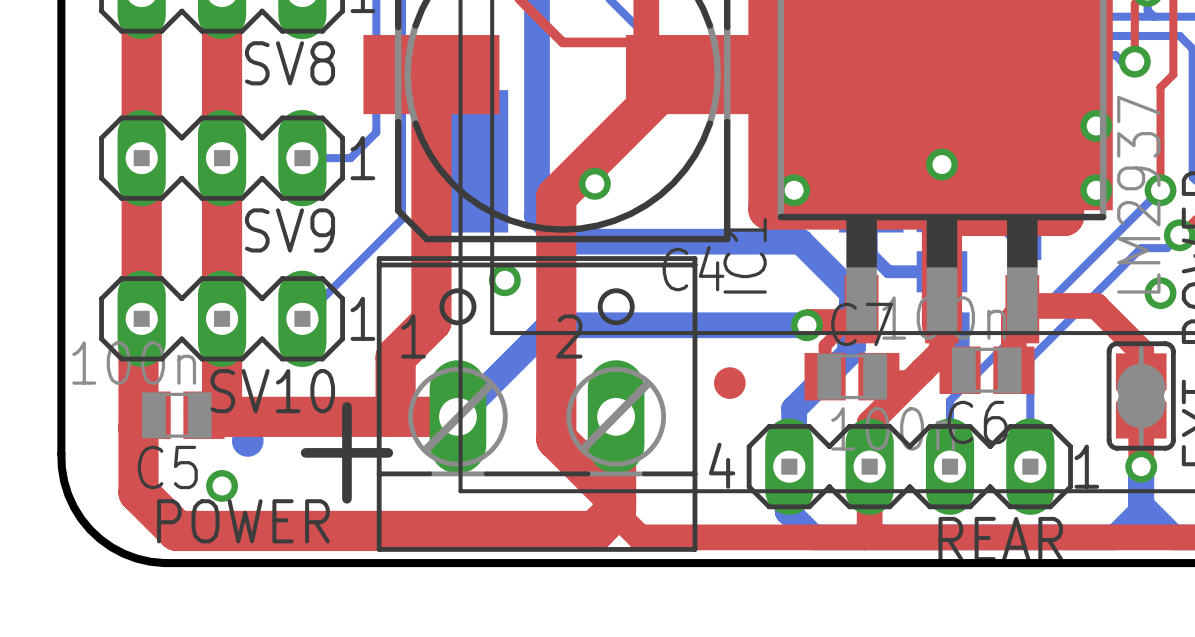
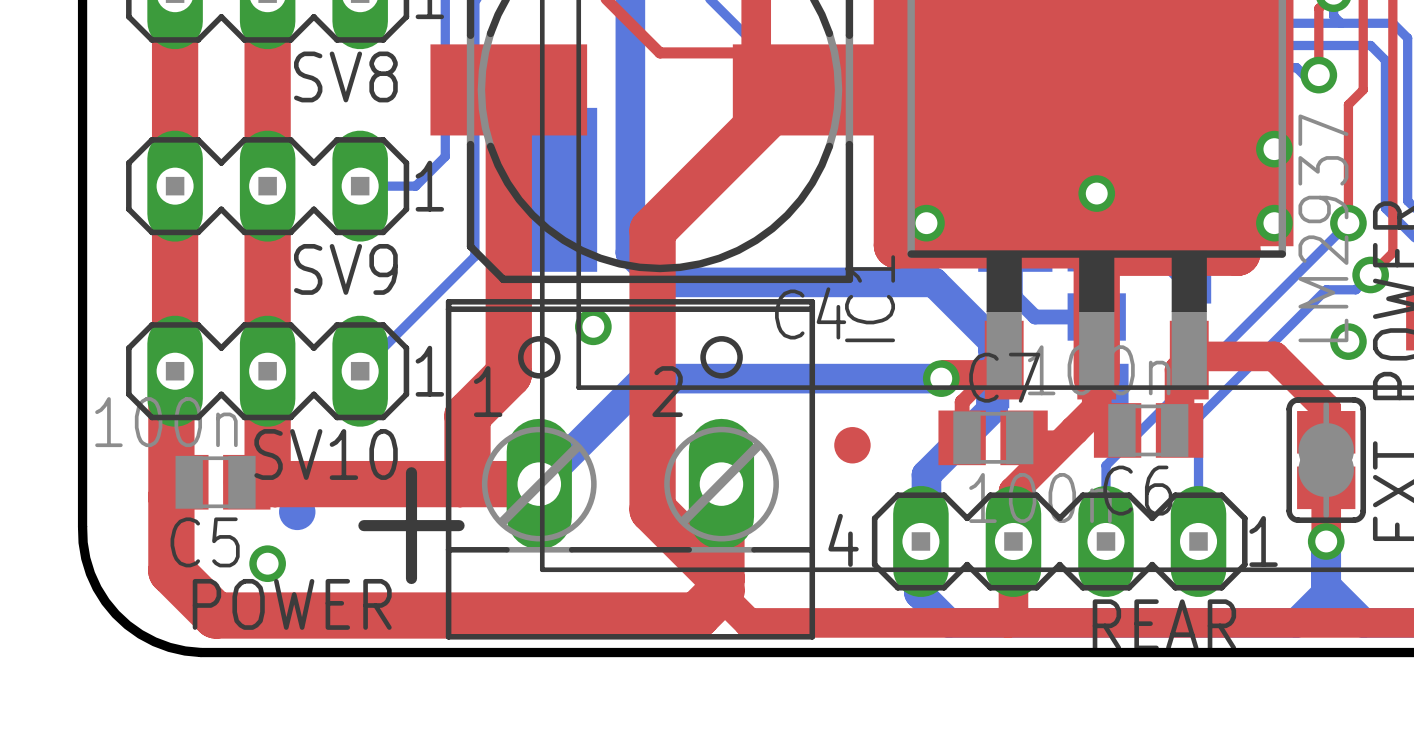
via: (594, 183) -> none

